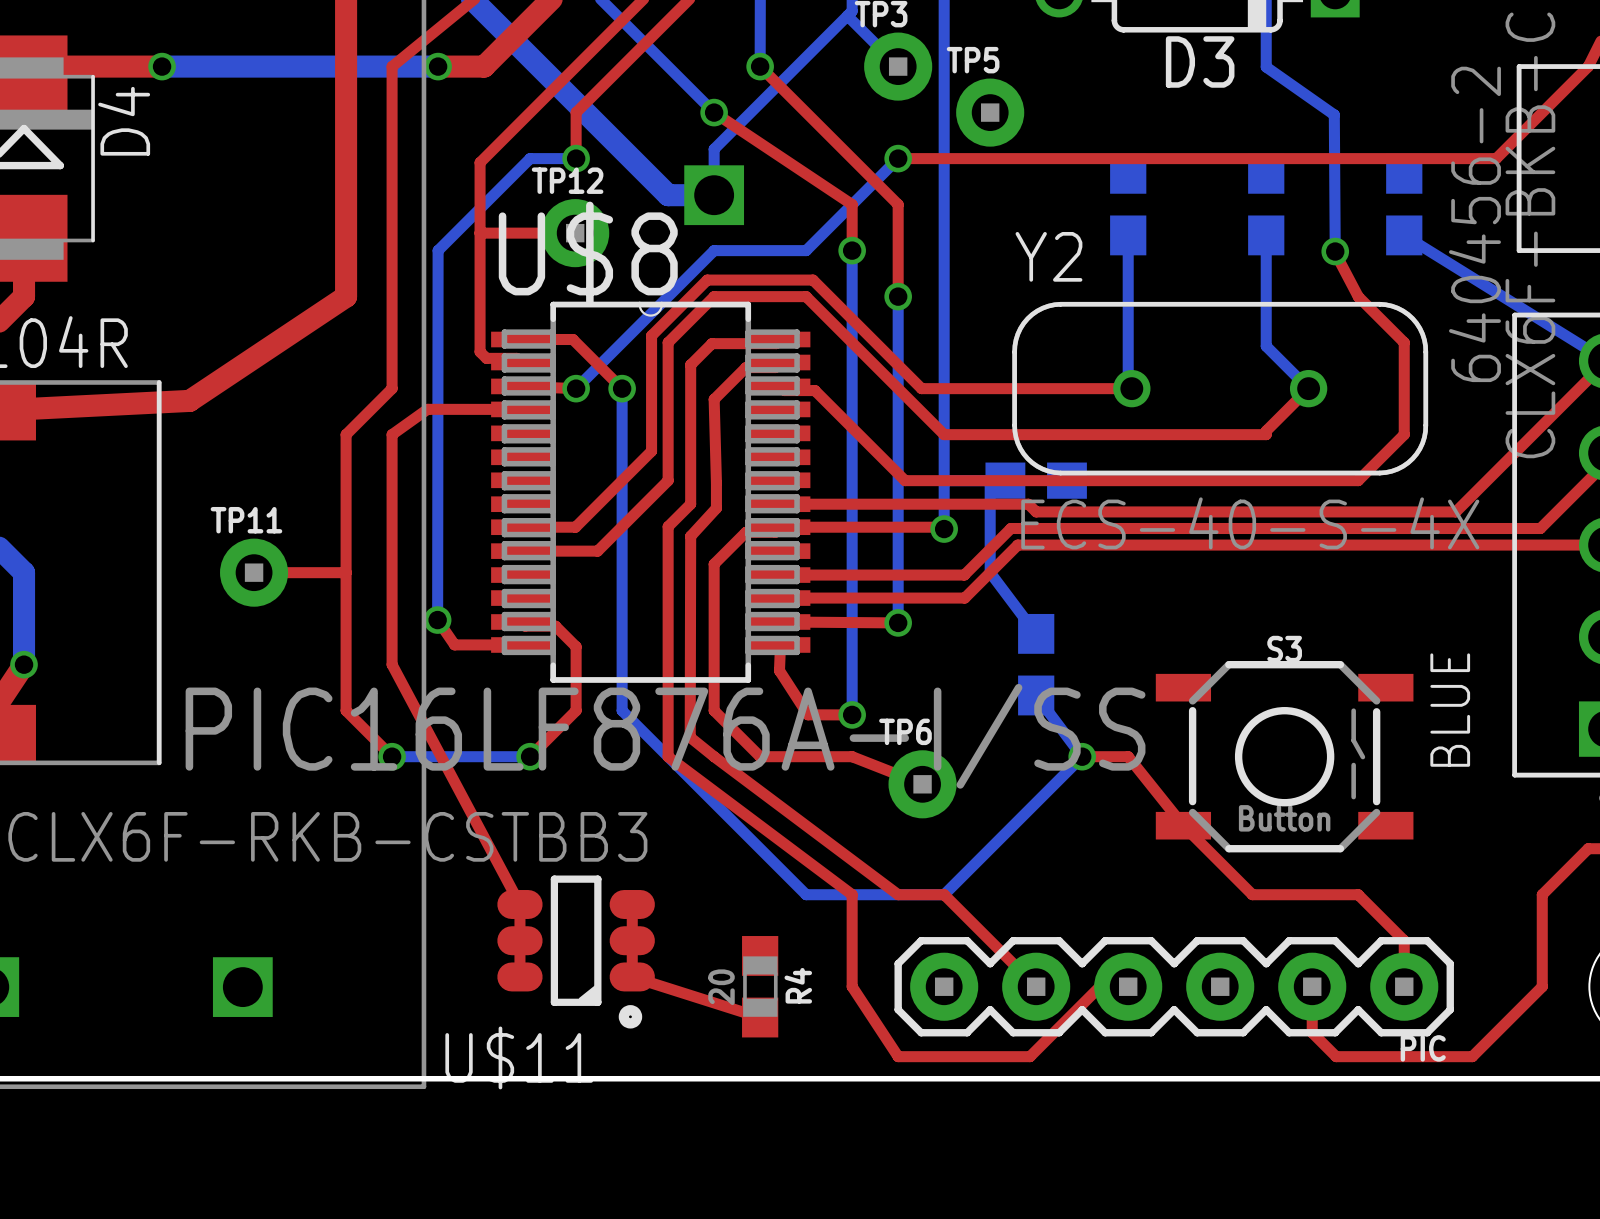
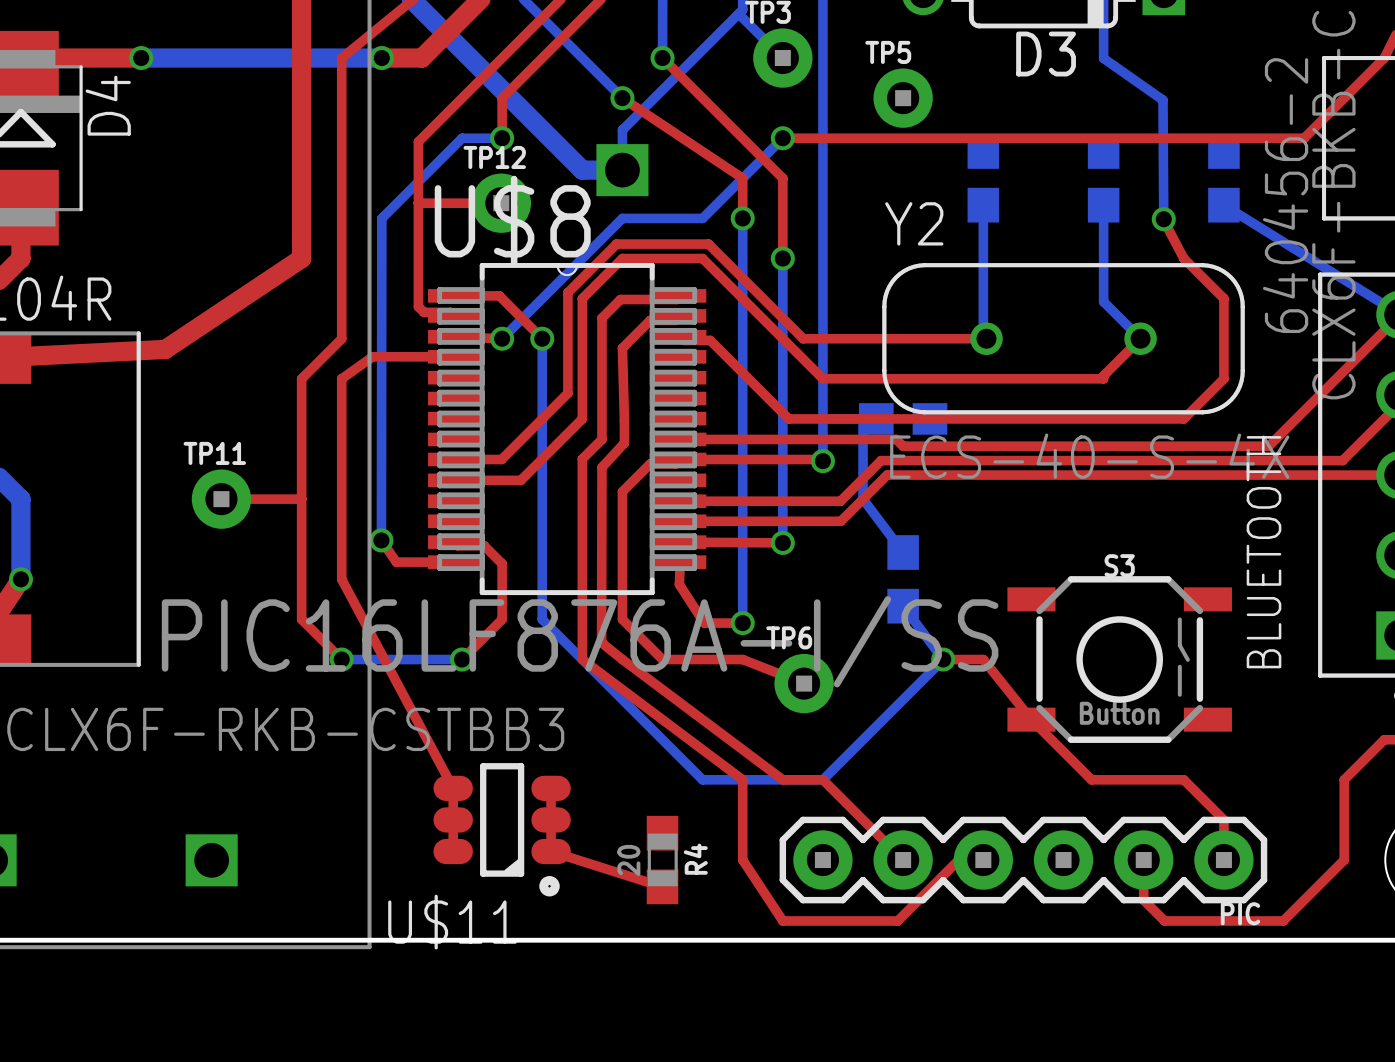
TP5 position: (990, 112) -> (903, 98)
BLUE name: BLUE (1450, 710) -> BLUETOOTH (1264, 552)

